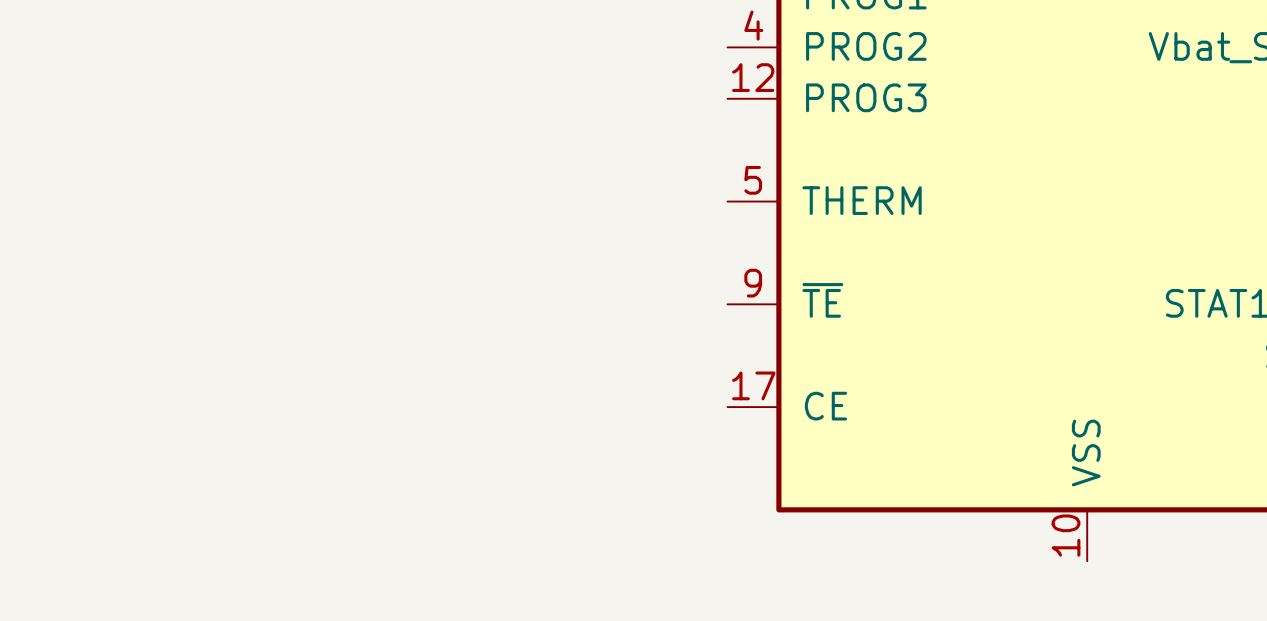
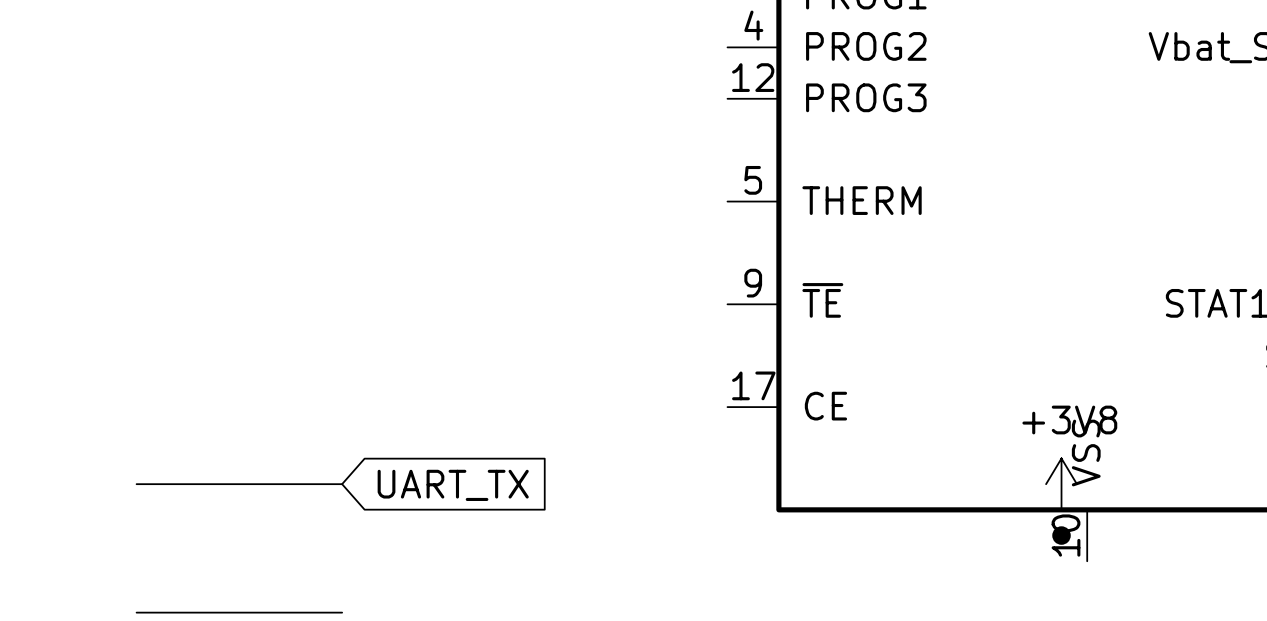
wire: none -> (136, 484) (342, 484)
power symbol: none -> +3V8 (1061, 484)
global label: none -> UART_TX (453, 485)
junction: none -> (1061, 535)
wire: none -> (136, 612) (342, 612)

